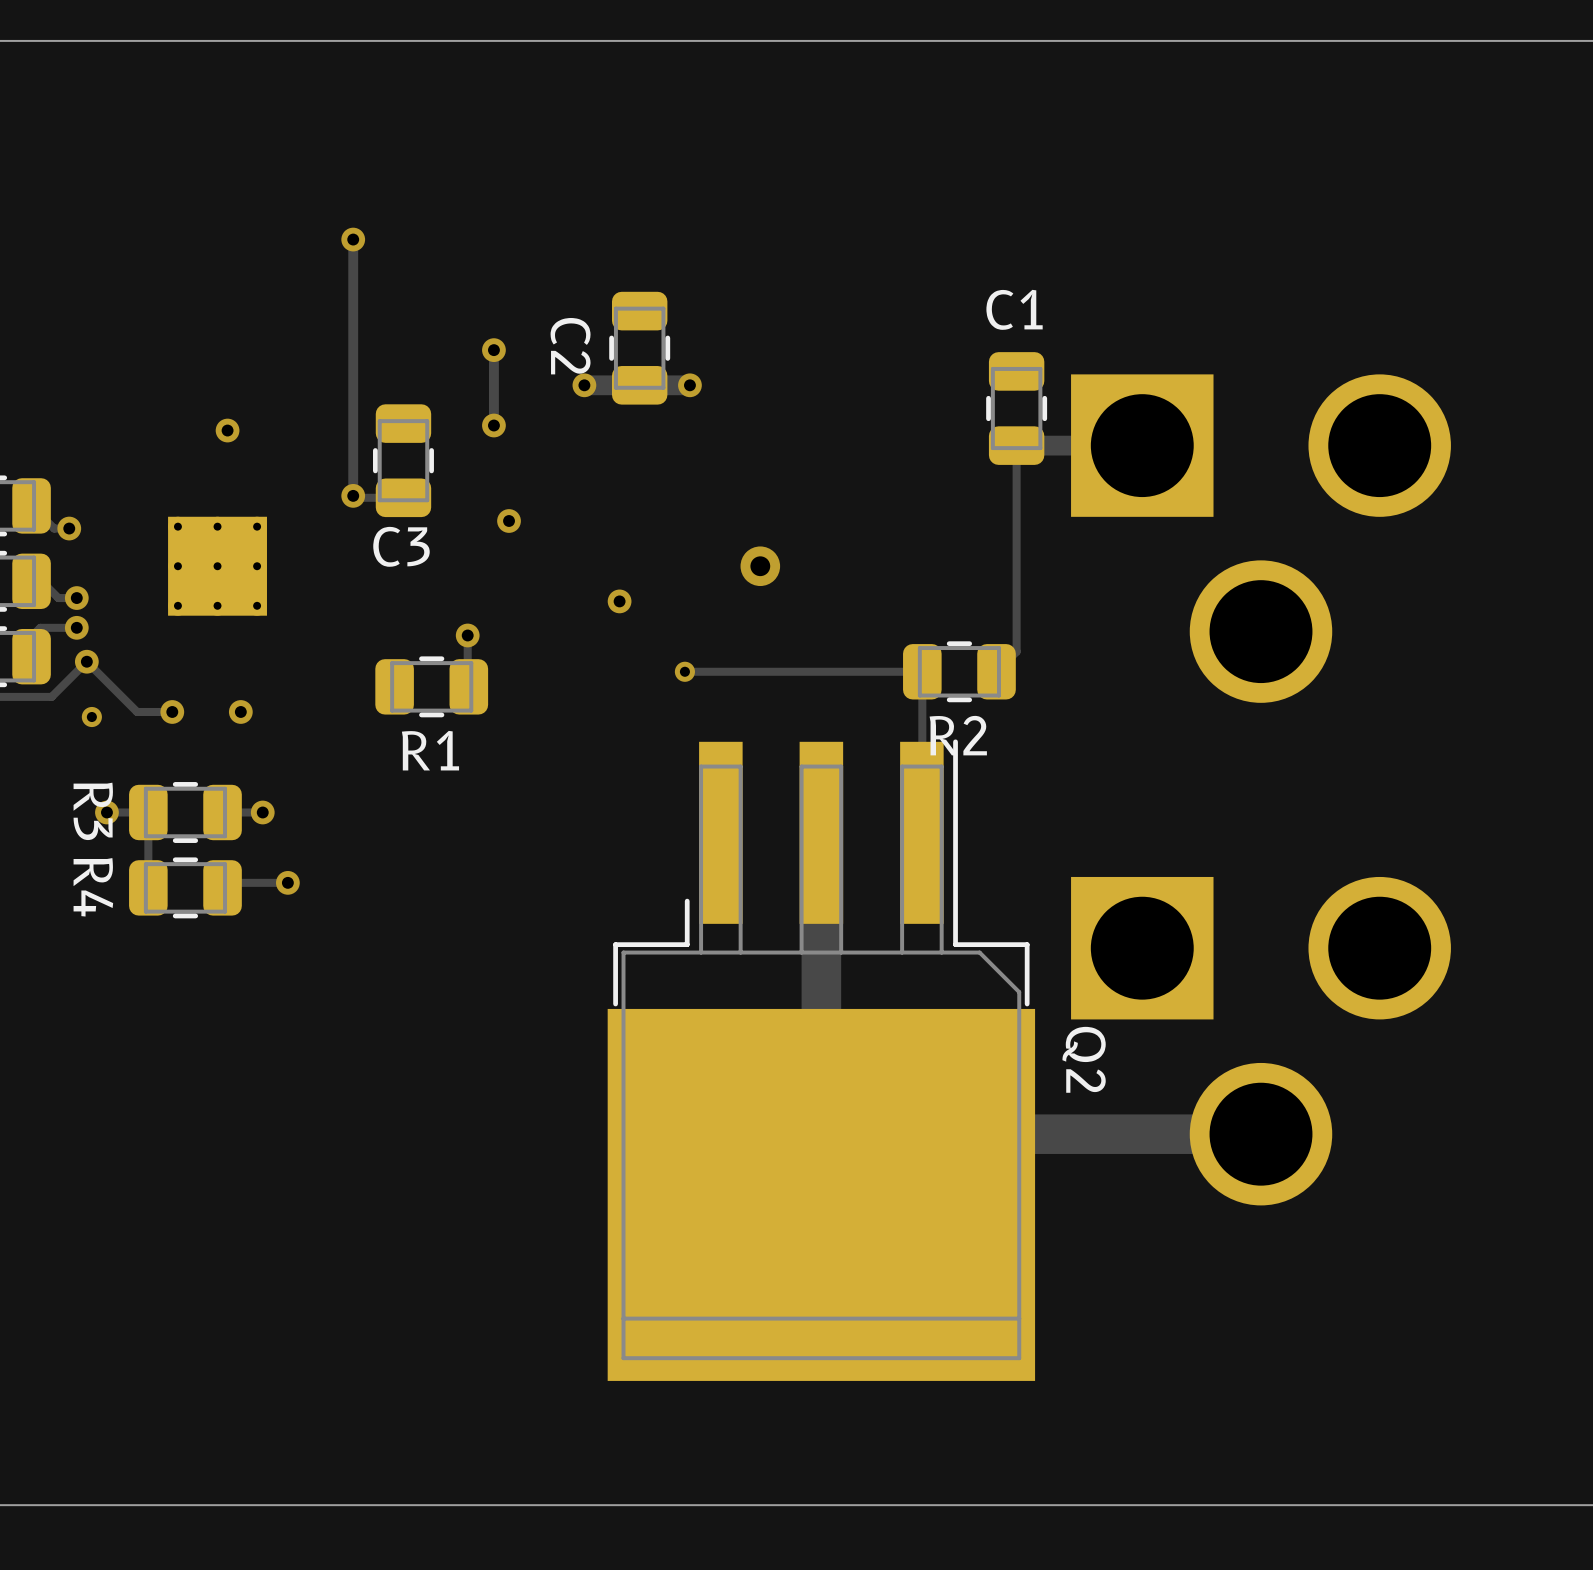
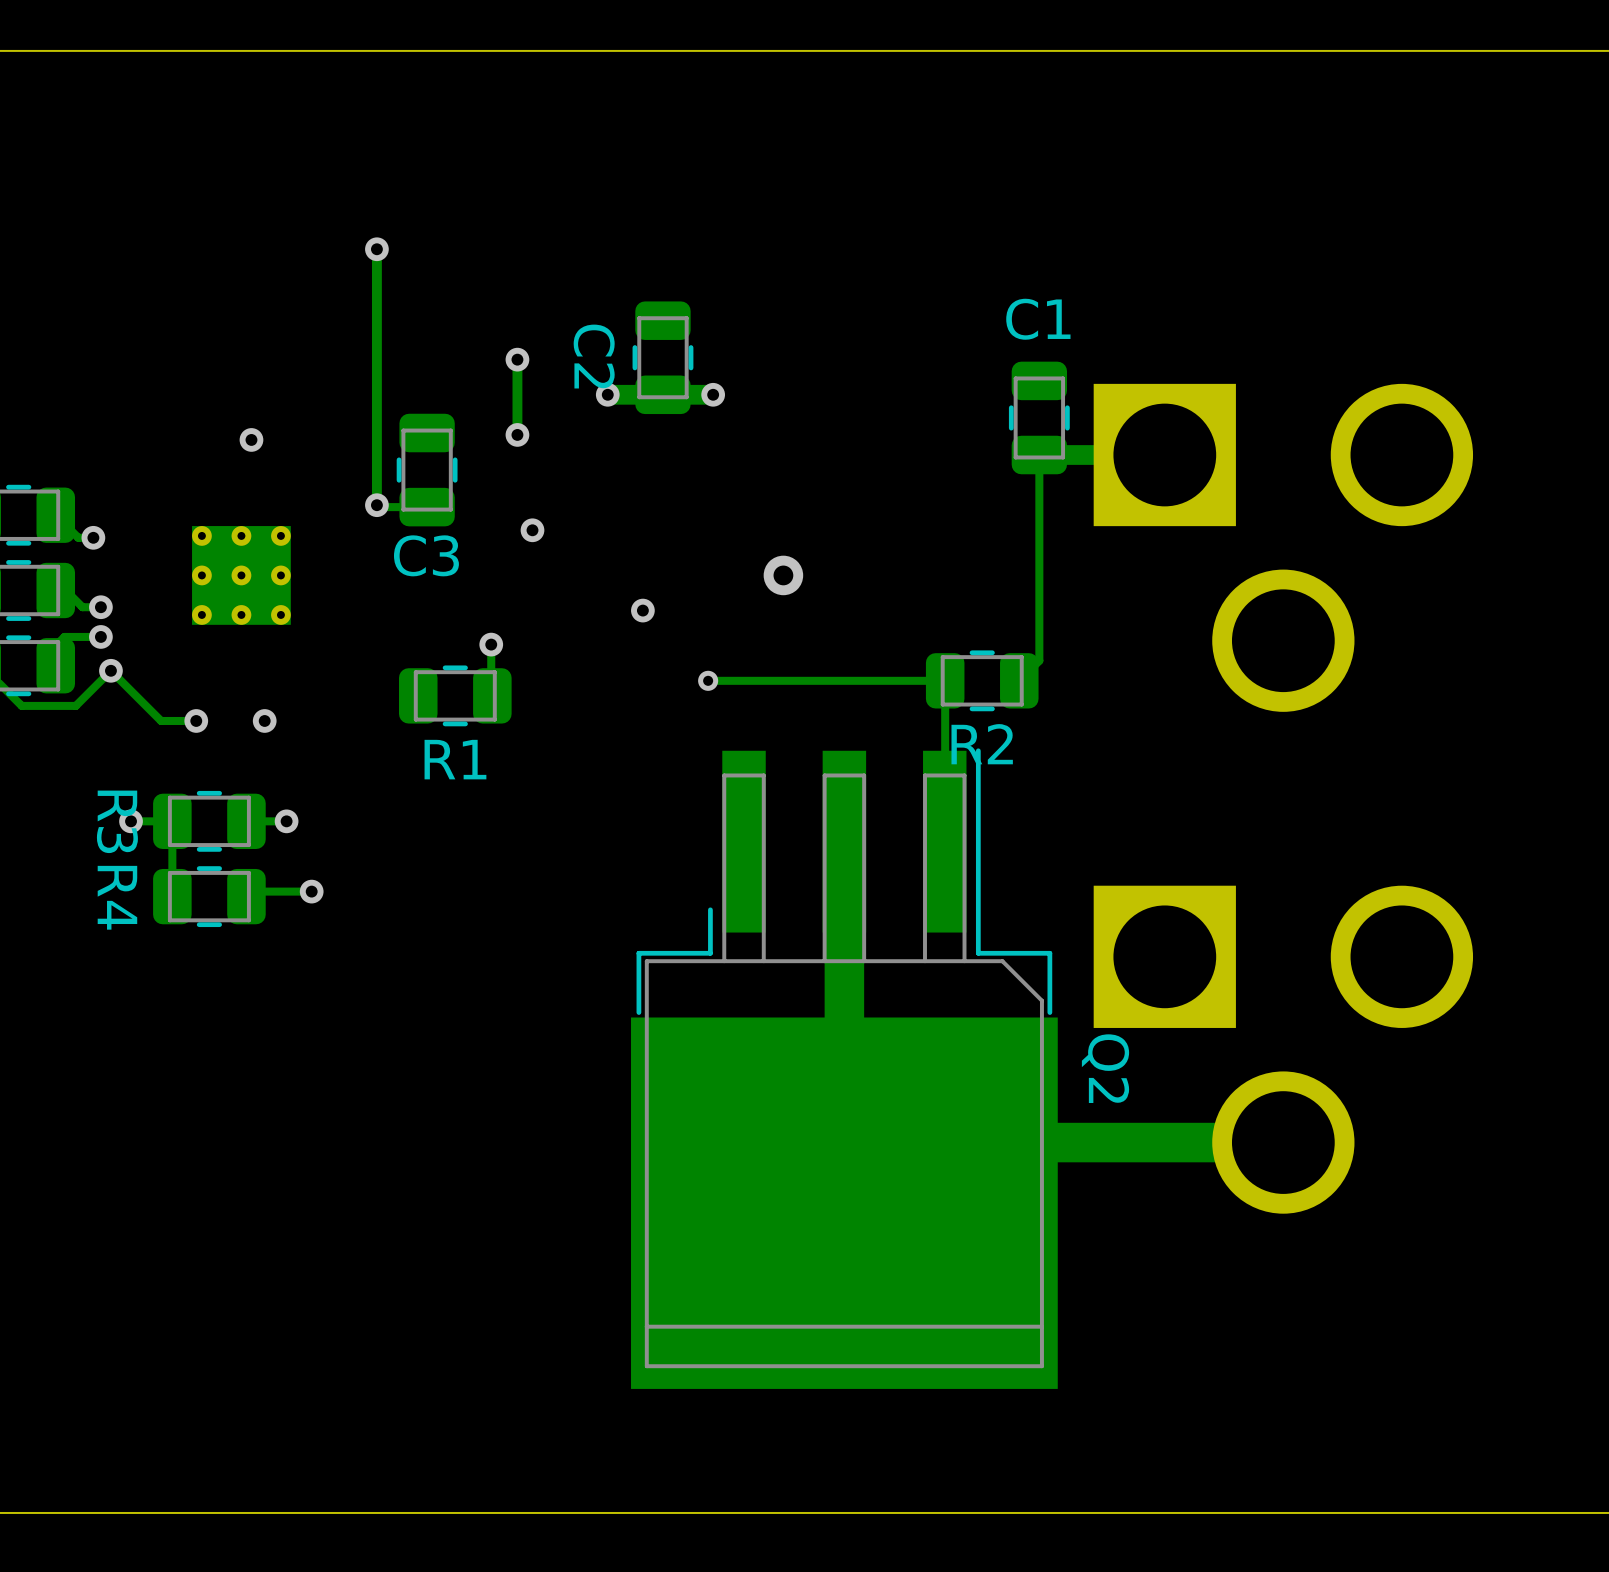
via: (91, 717) -> none

